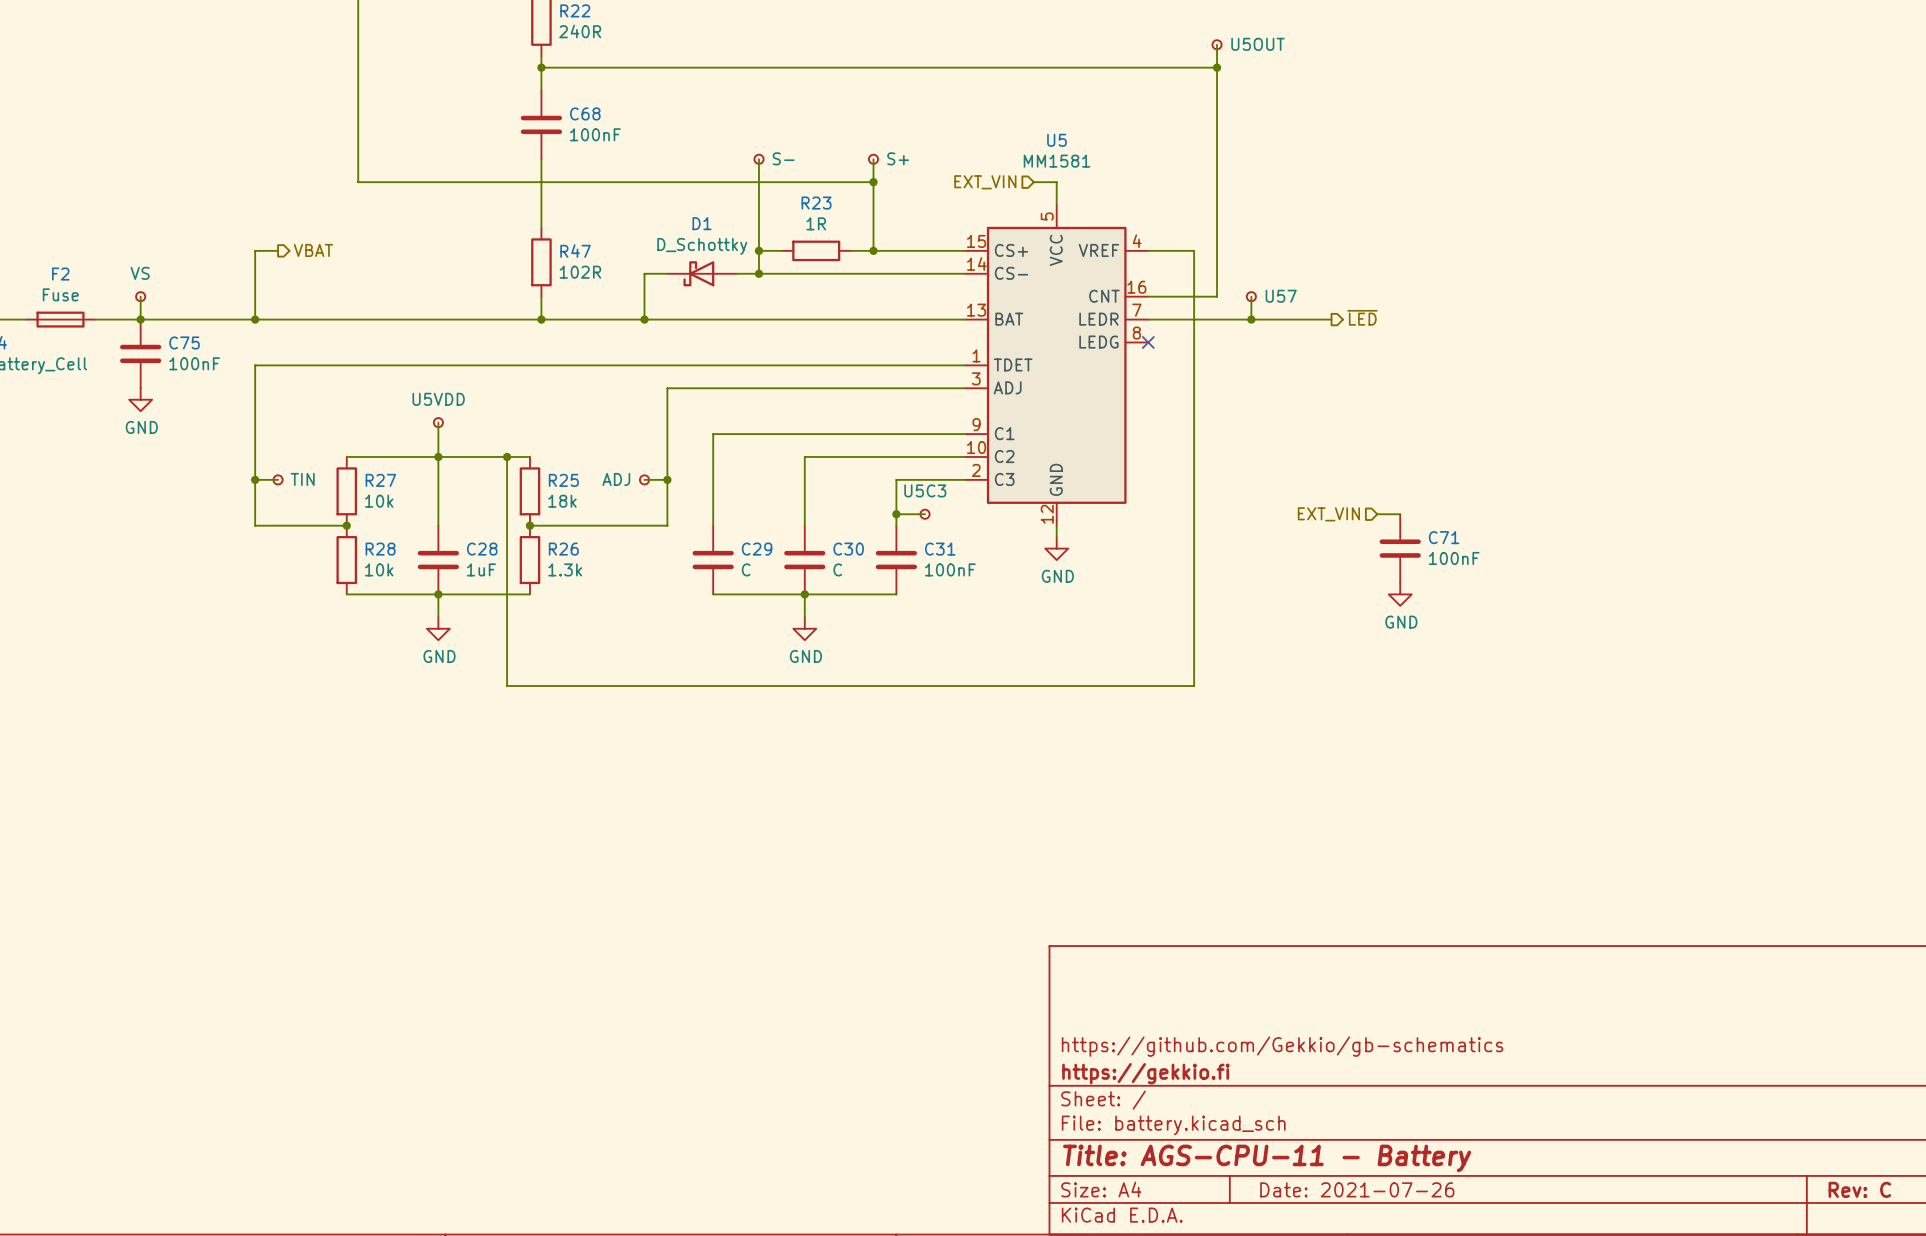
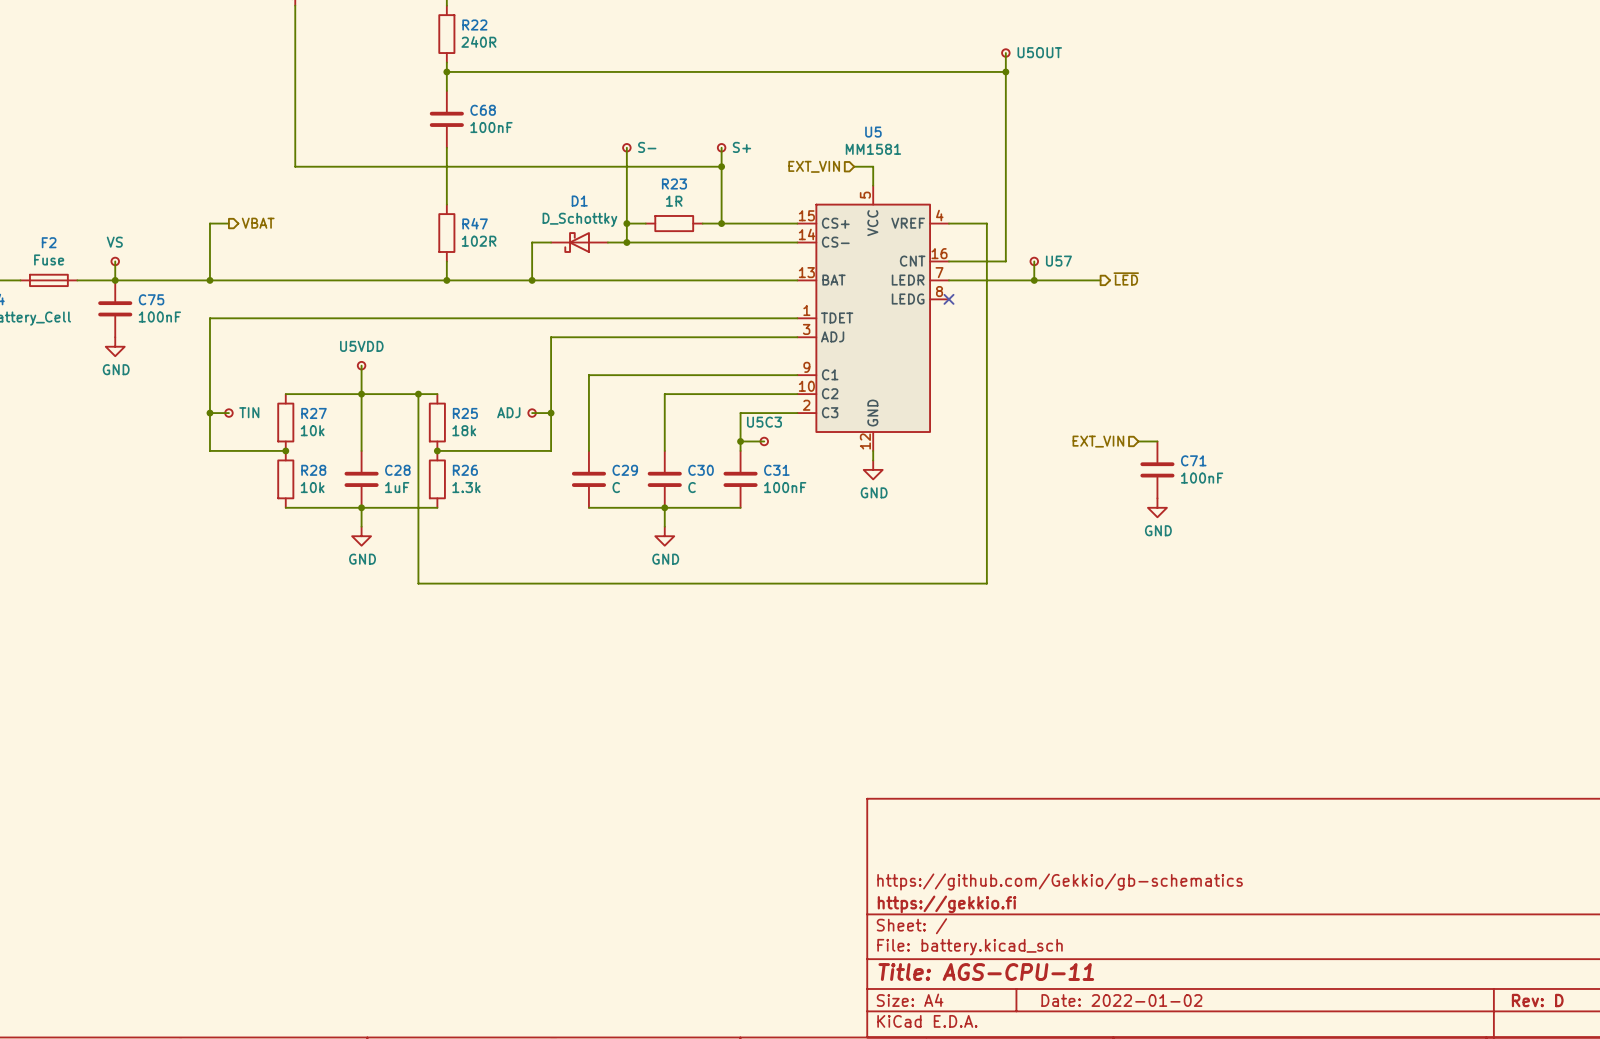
title block: Title: AGS-CPU-11 - Battery (1267, 1158) -> Title: AGS-CPU-11 (986, 972)
title block: Date: 2021-07-26 (1357, 1189) -> Date: 2022-01-02 (1121, 1000)
title block: Rev: C (1859, 1189) -> Rev: D (1537, 1000)

